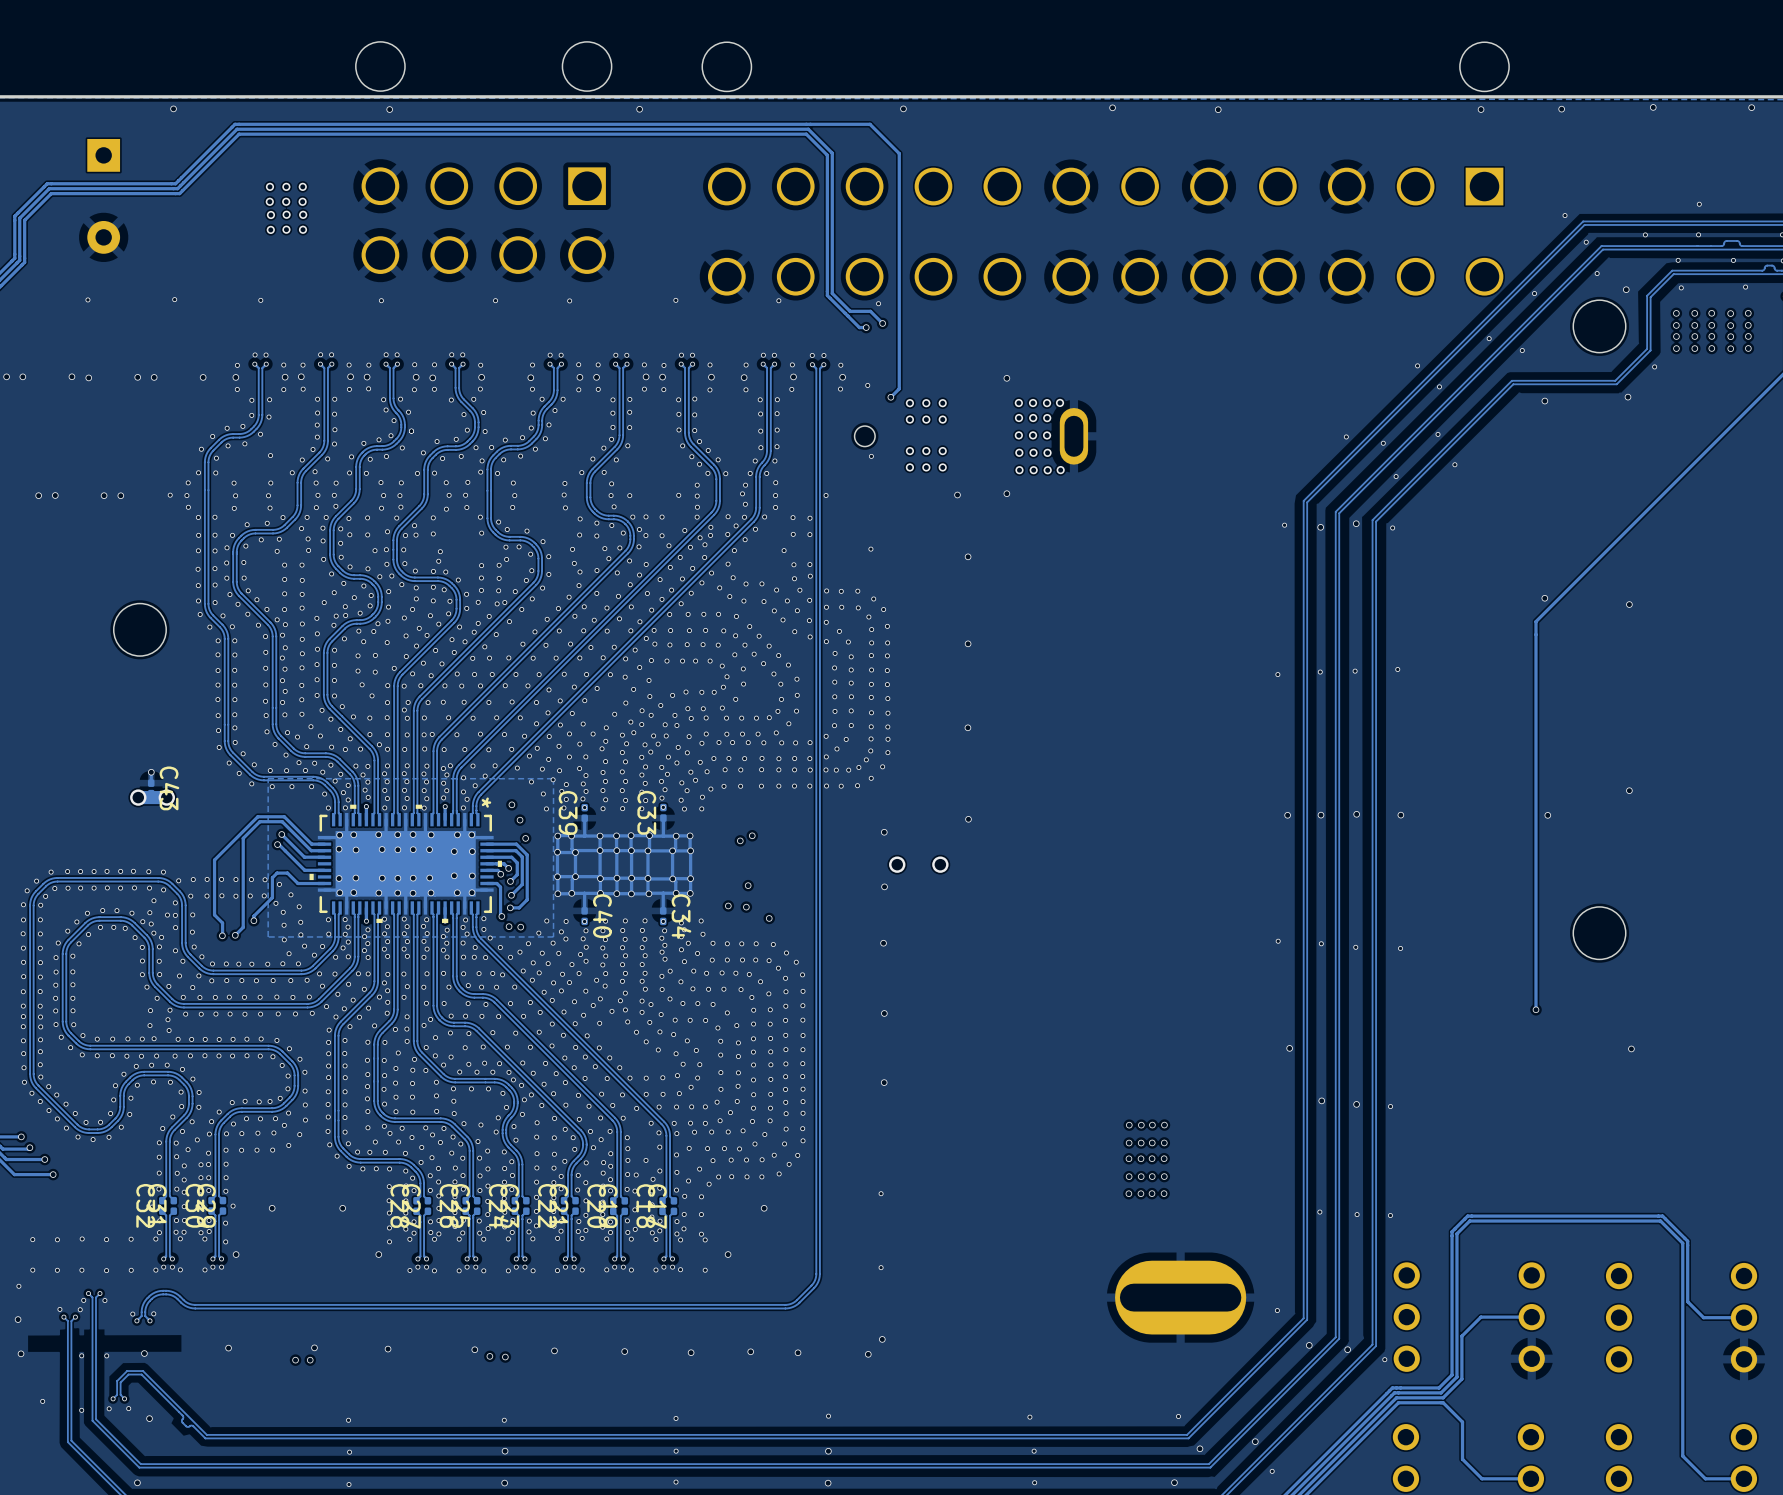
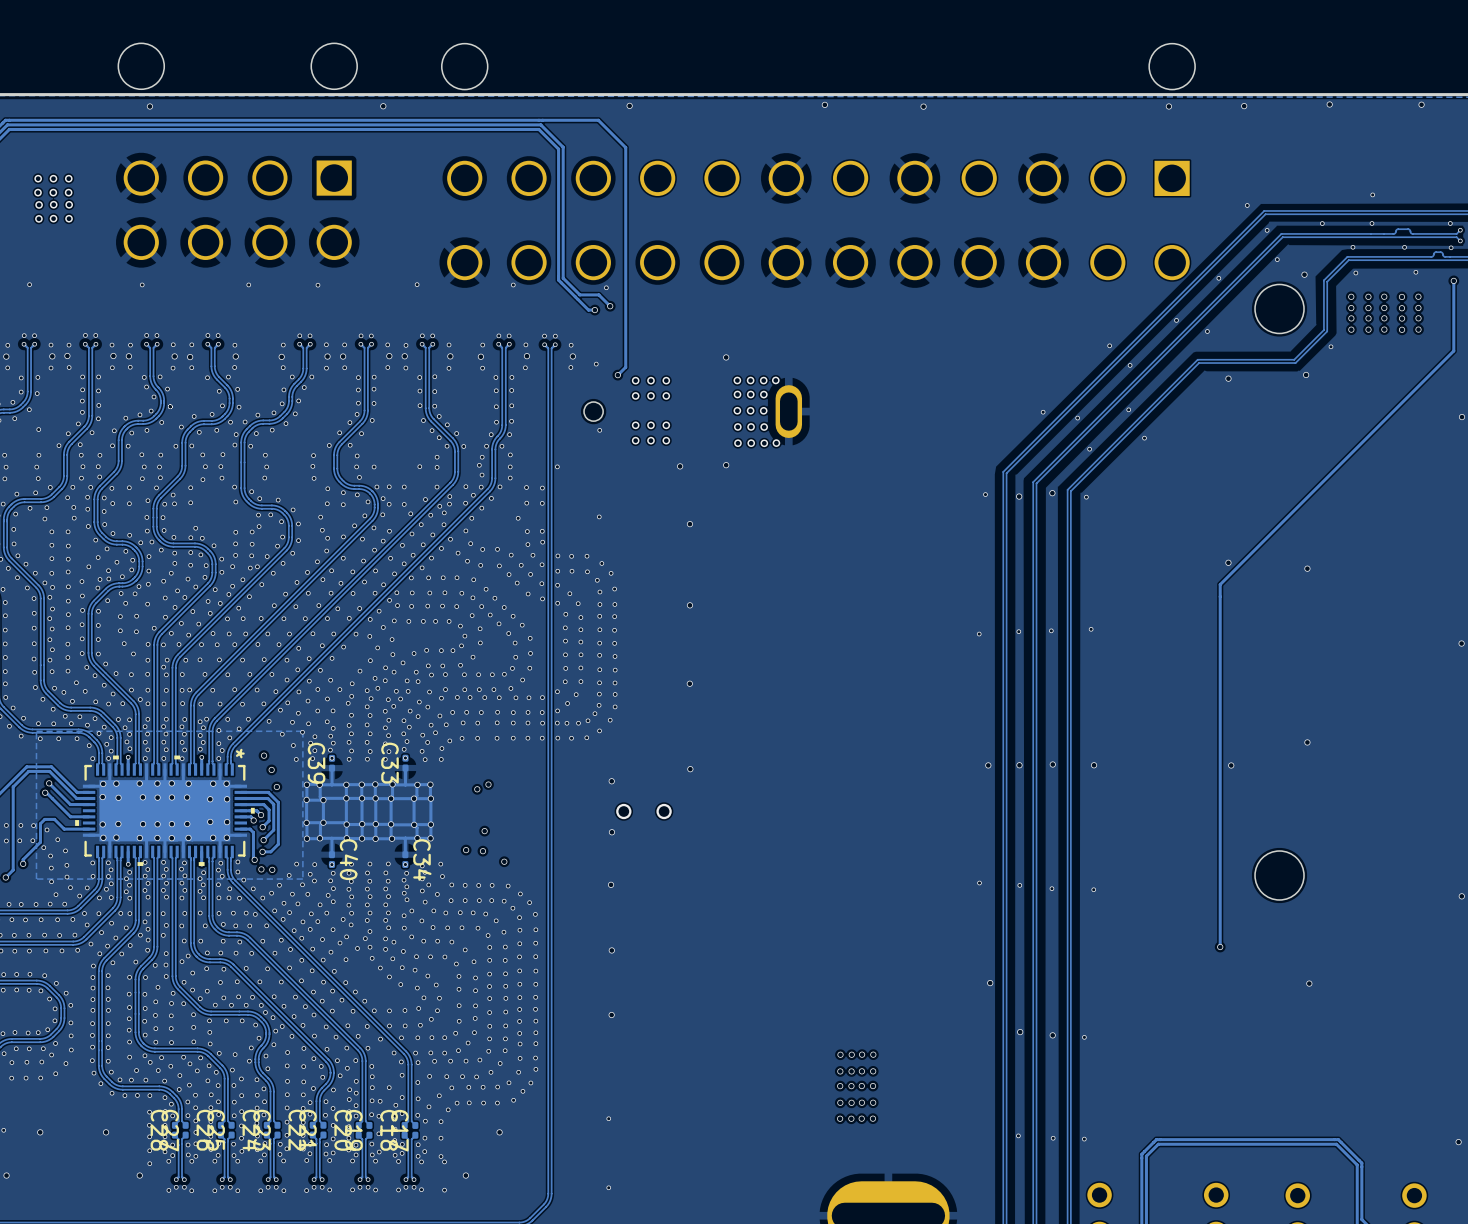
via: (697, 507) -> none
via: (604, 548) -> none
via: (375, 550) -> none
via: (440, 551) -> none

